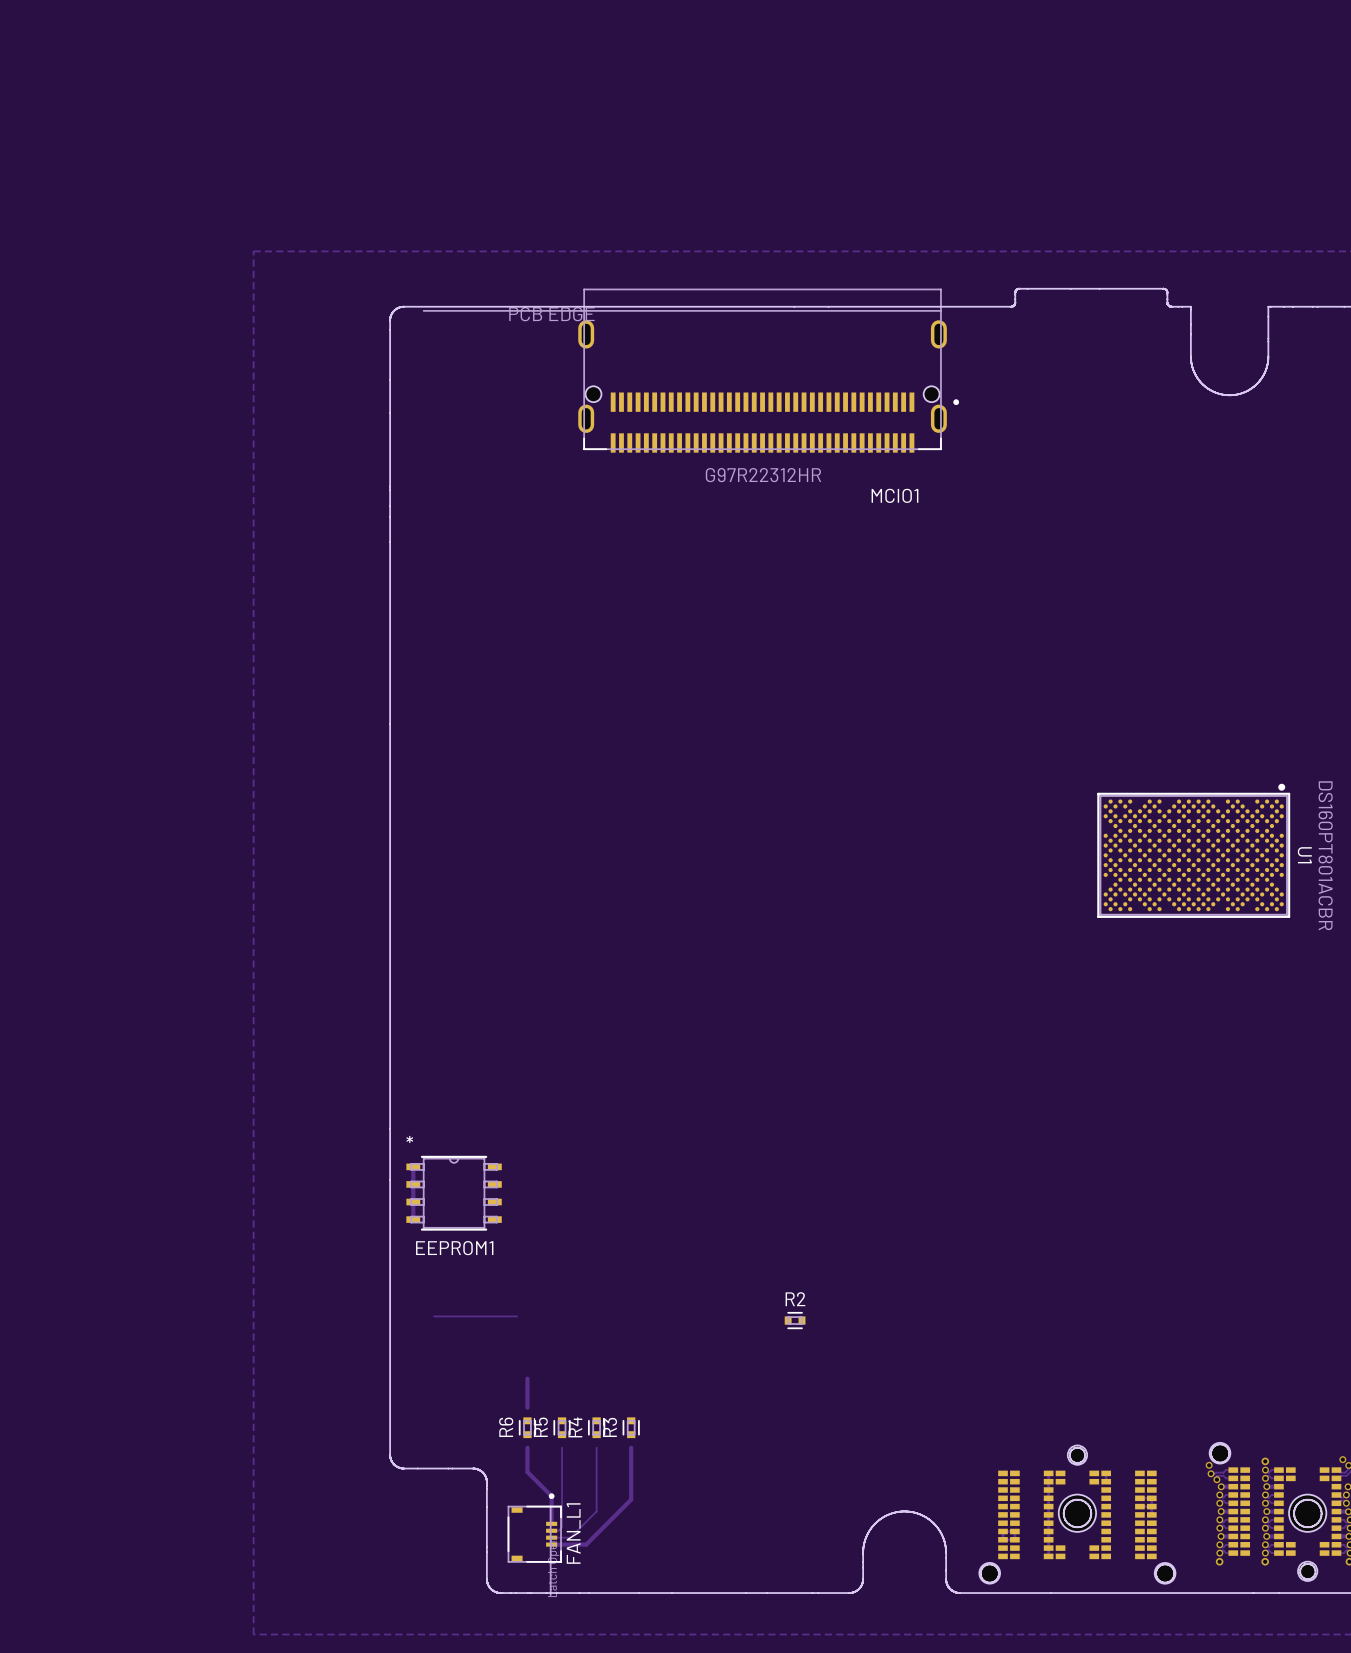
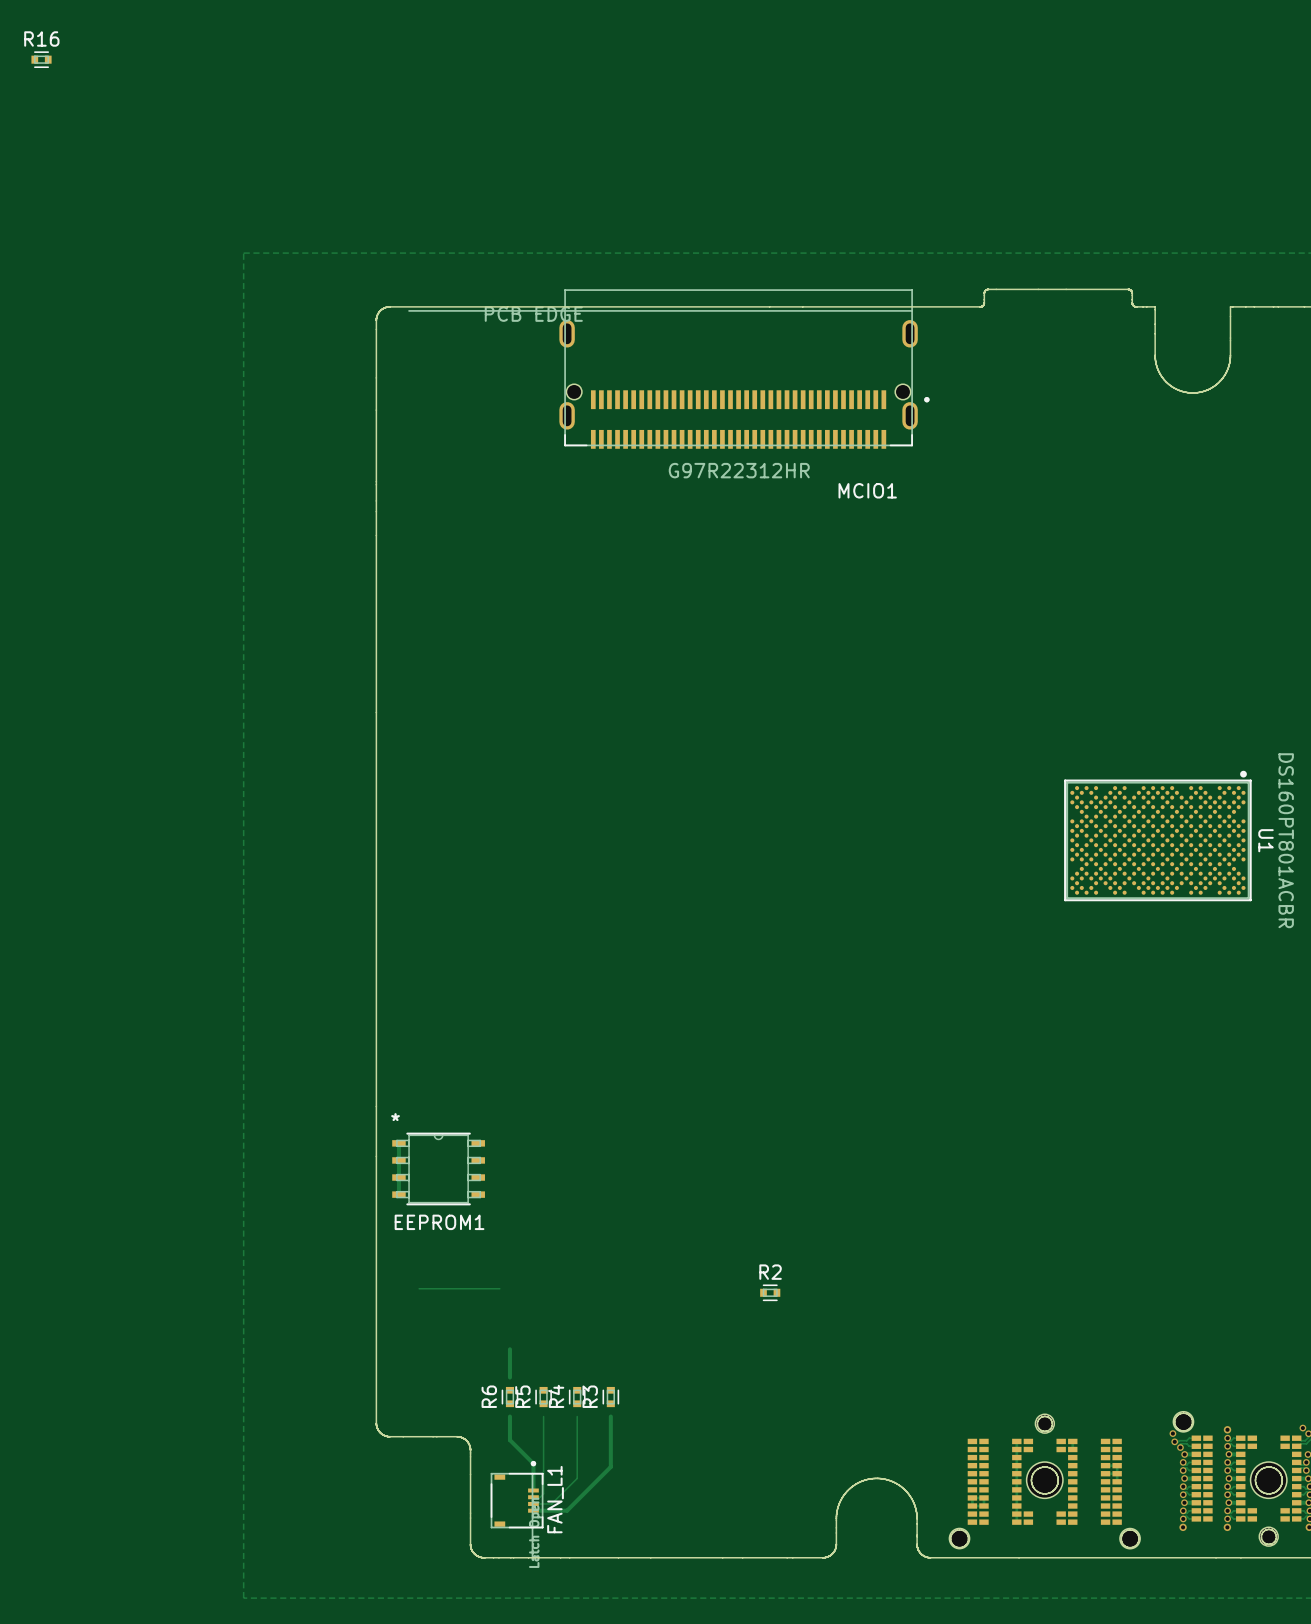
R16: none -> (41, 59)

